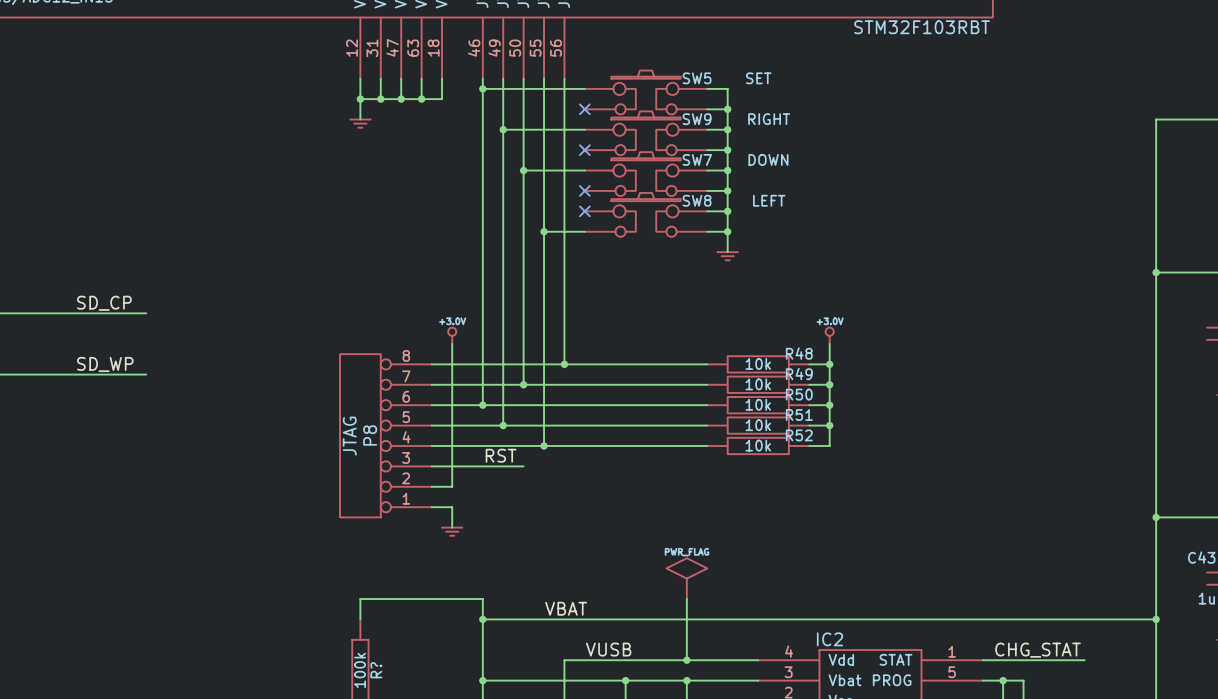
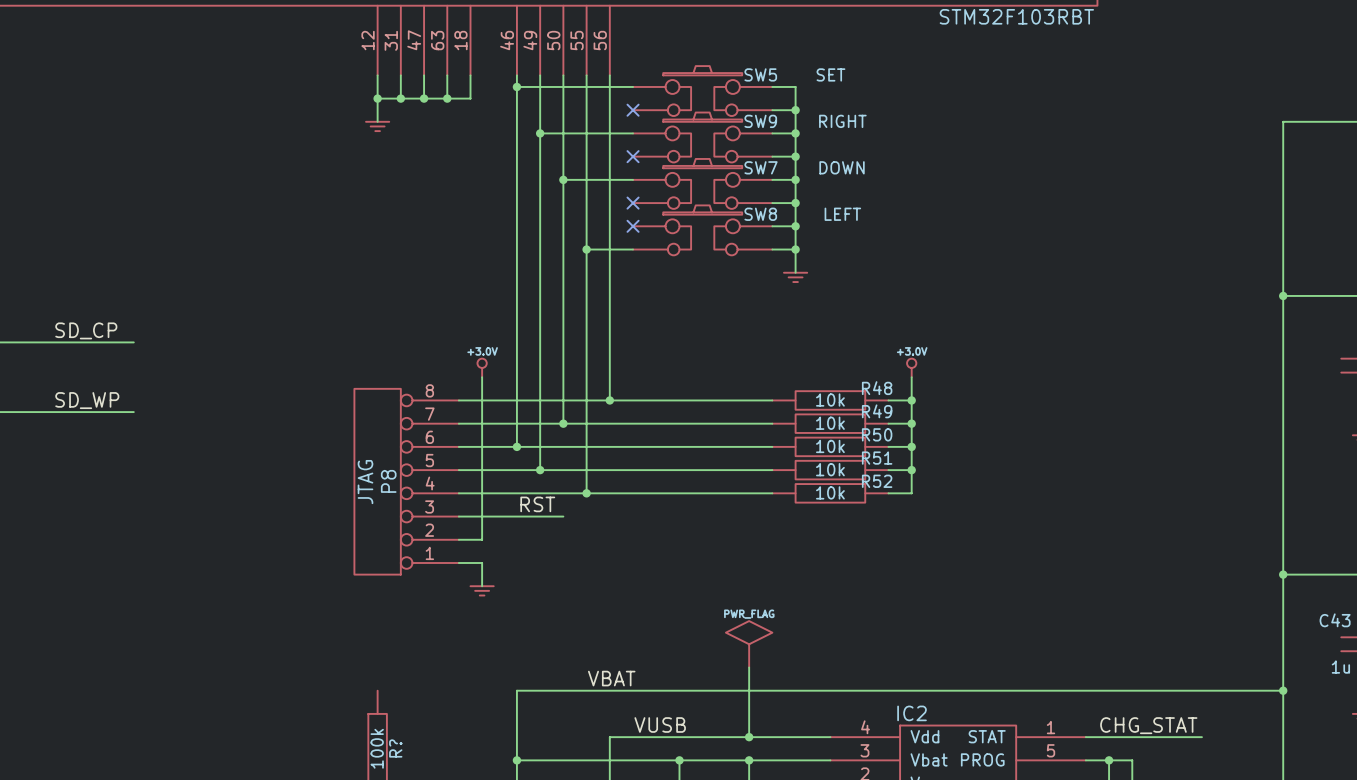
wire: (360, 619) (360, 599) (482, 599) (482, 619) -> none
junction: (482, 619) -> none

